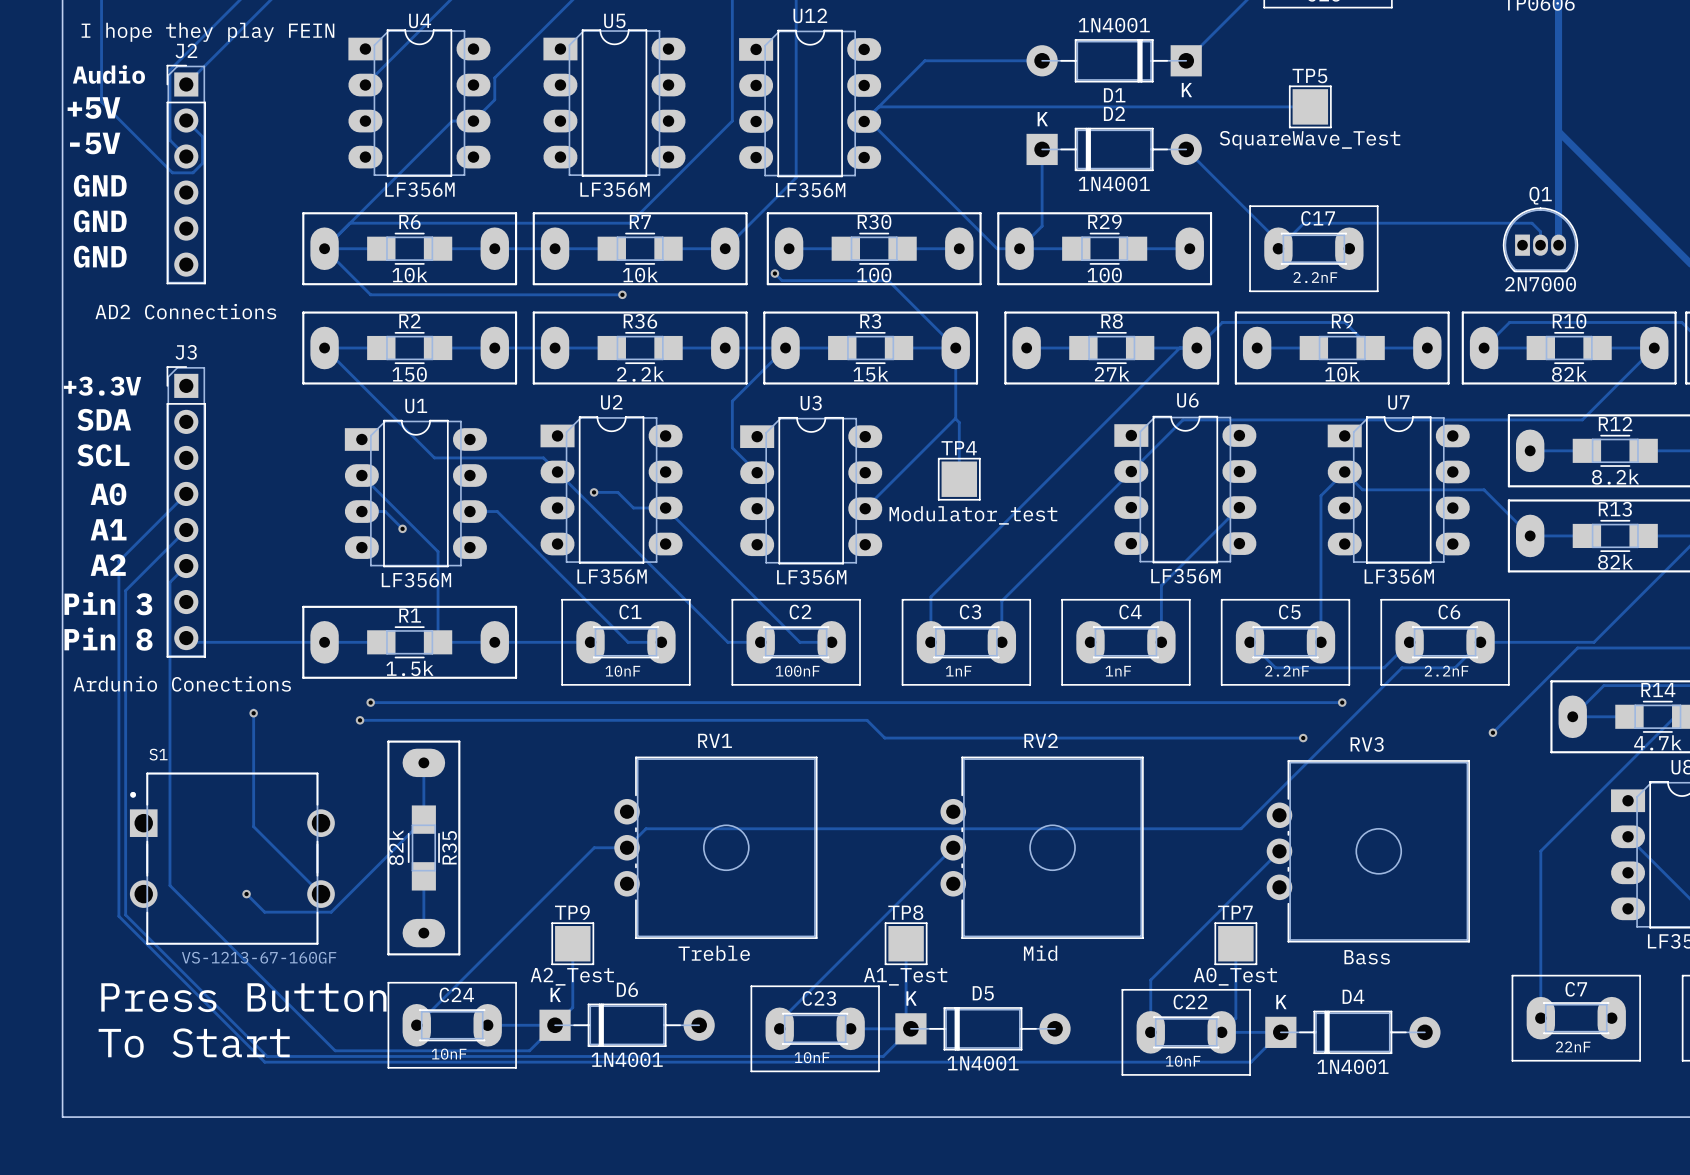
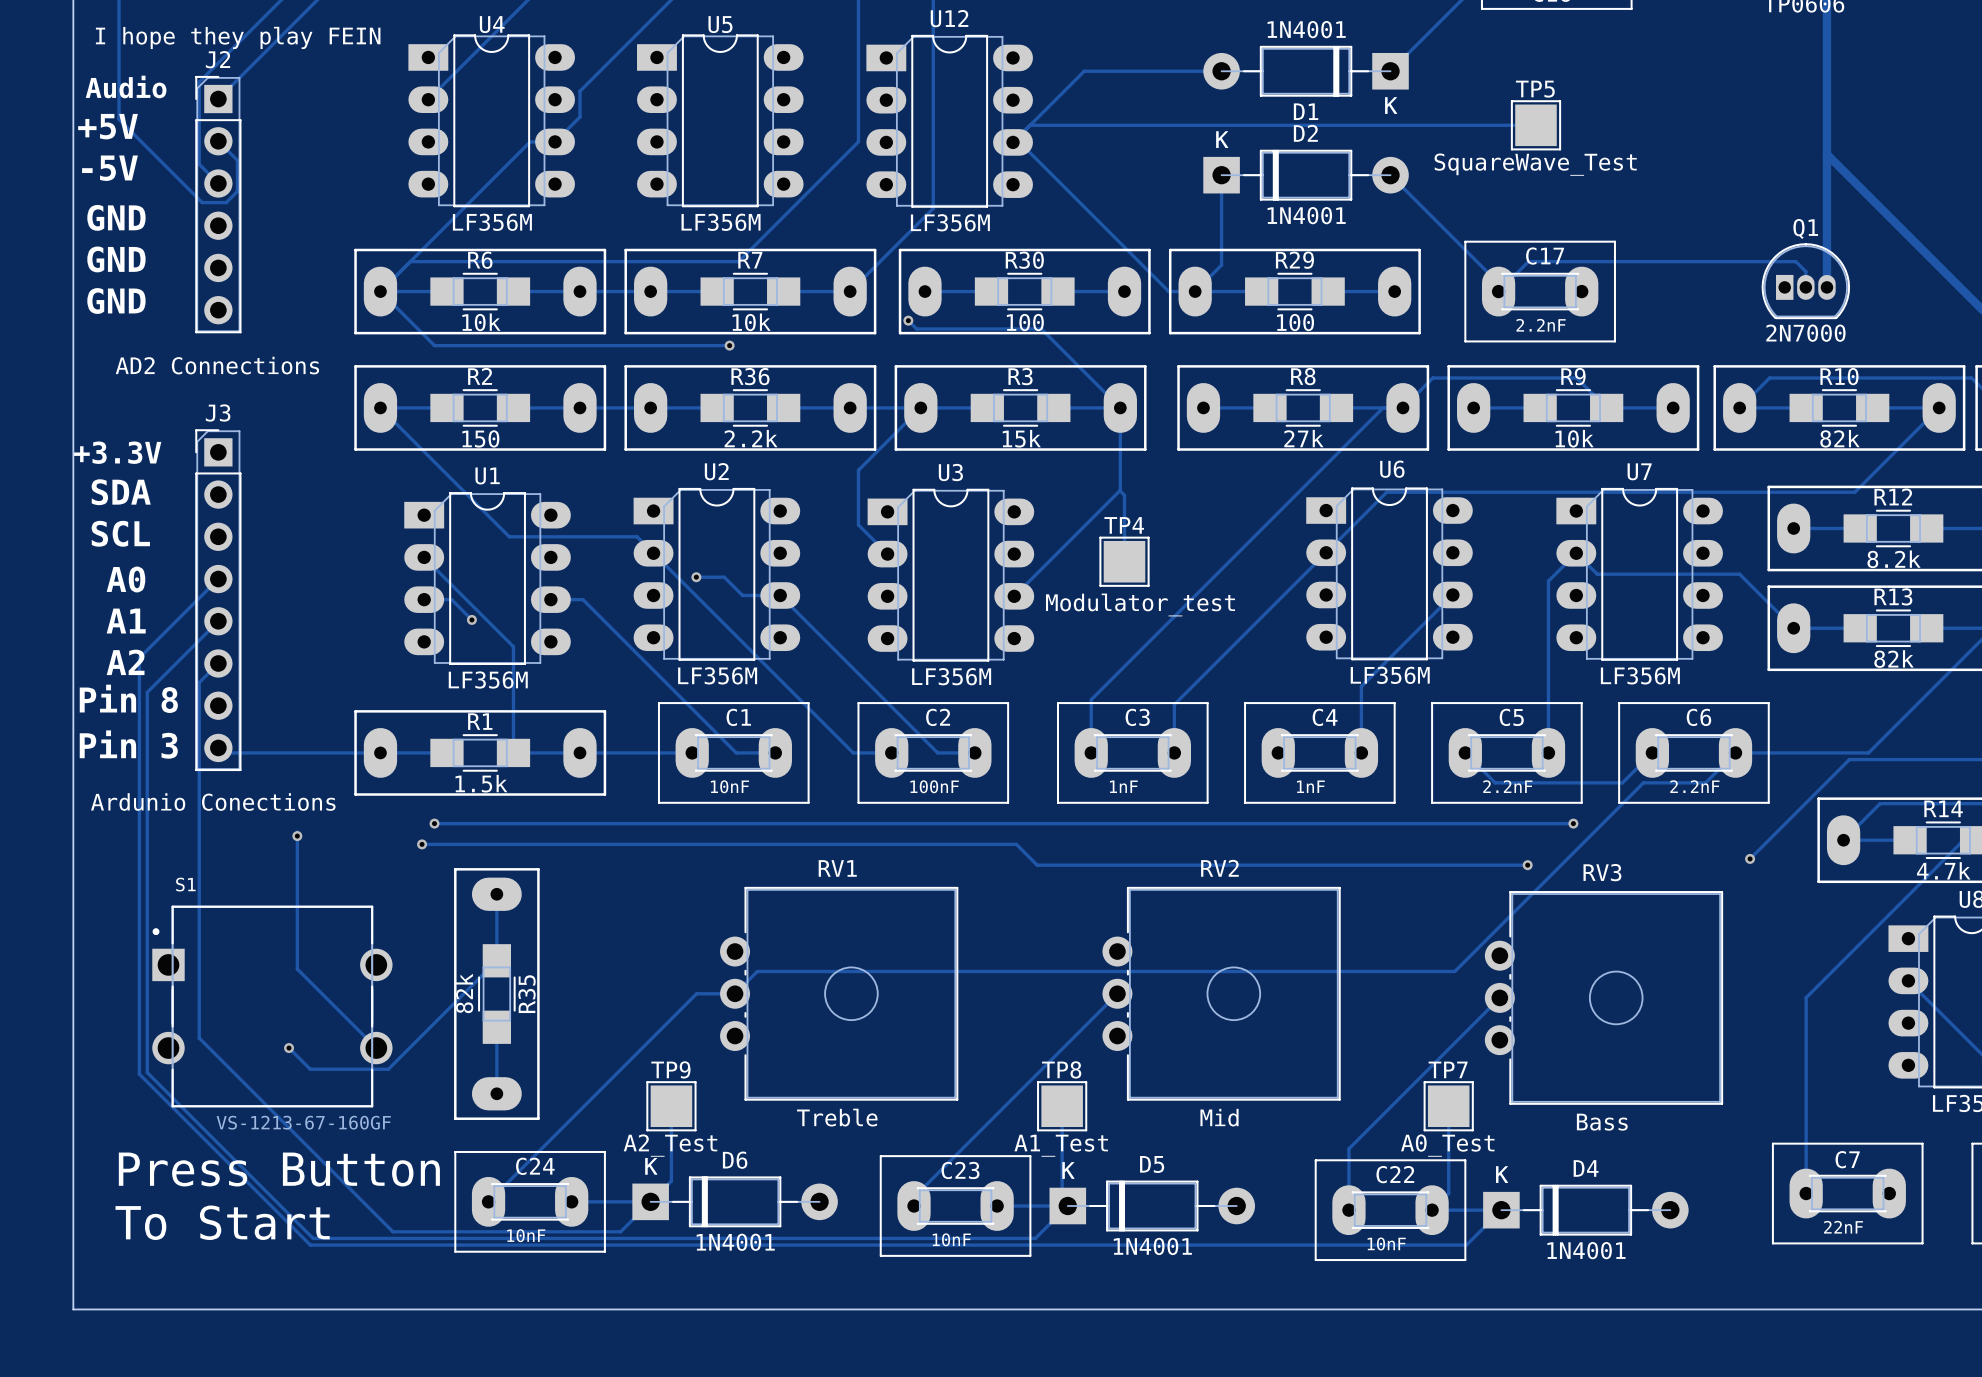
text position: Pin 3 (108, 603) -> Pin 3 (128, 744)
text position: Pin 8 (108, 639) -> Pin 8 (128, 698)

